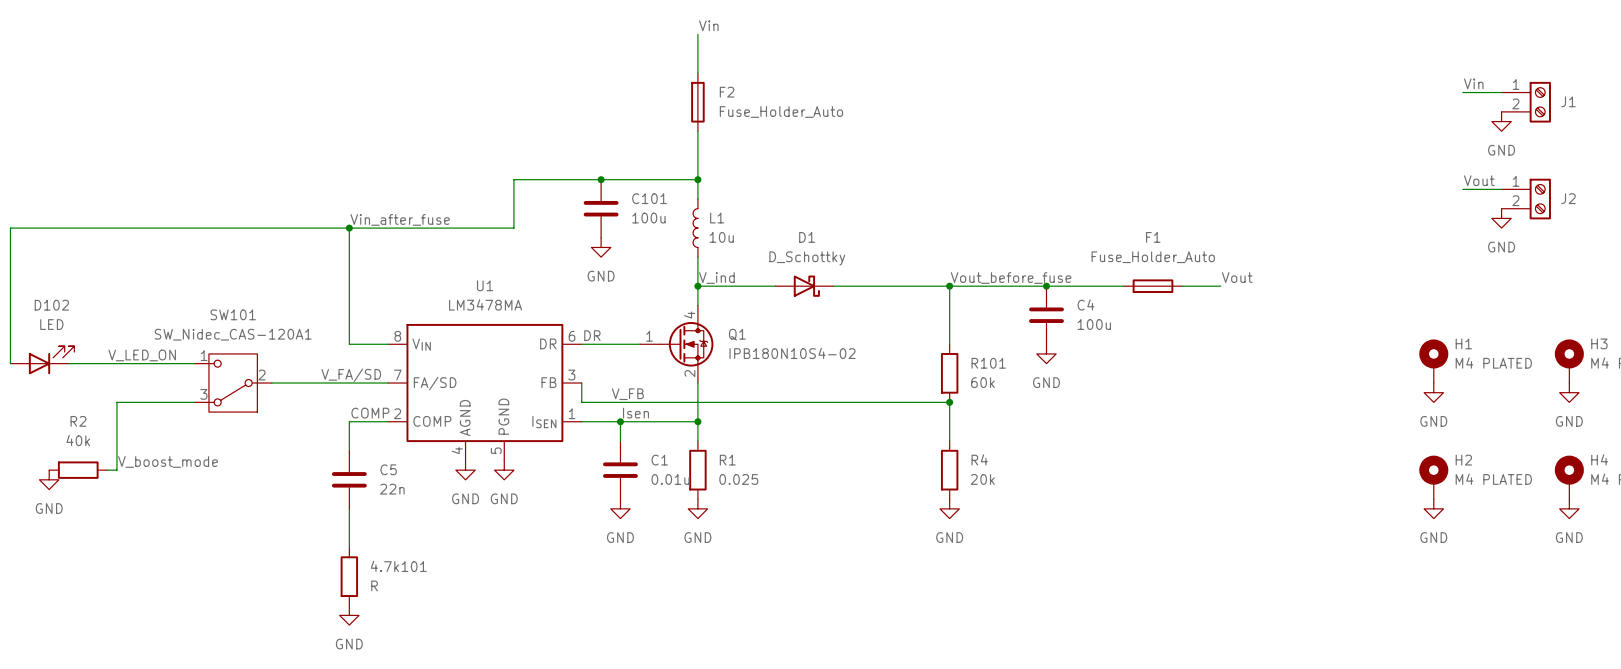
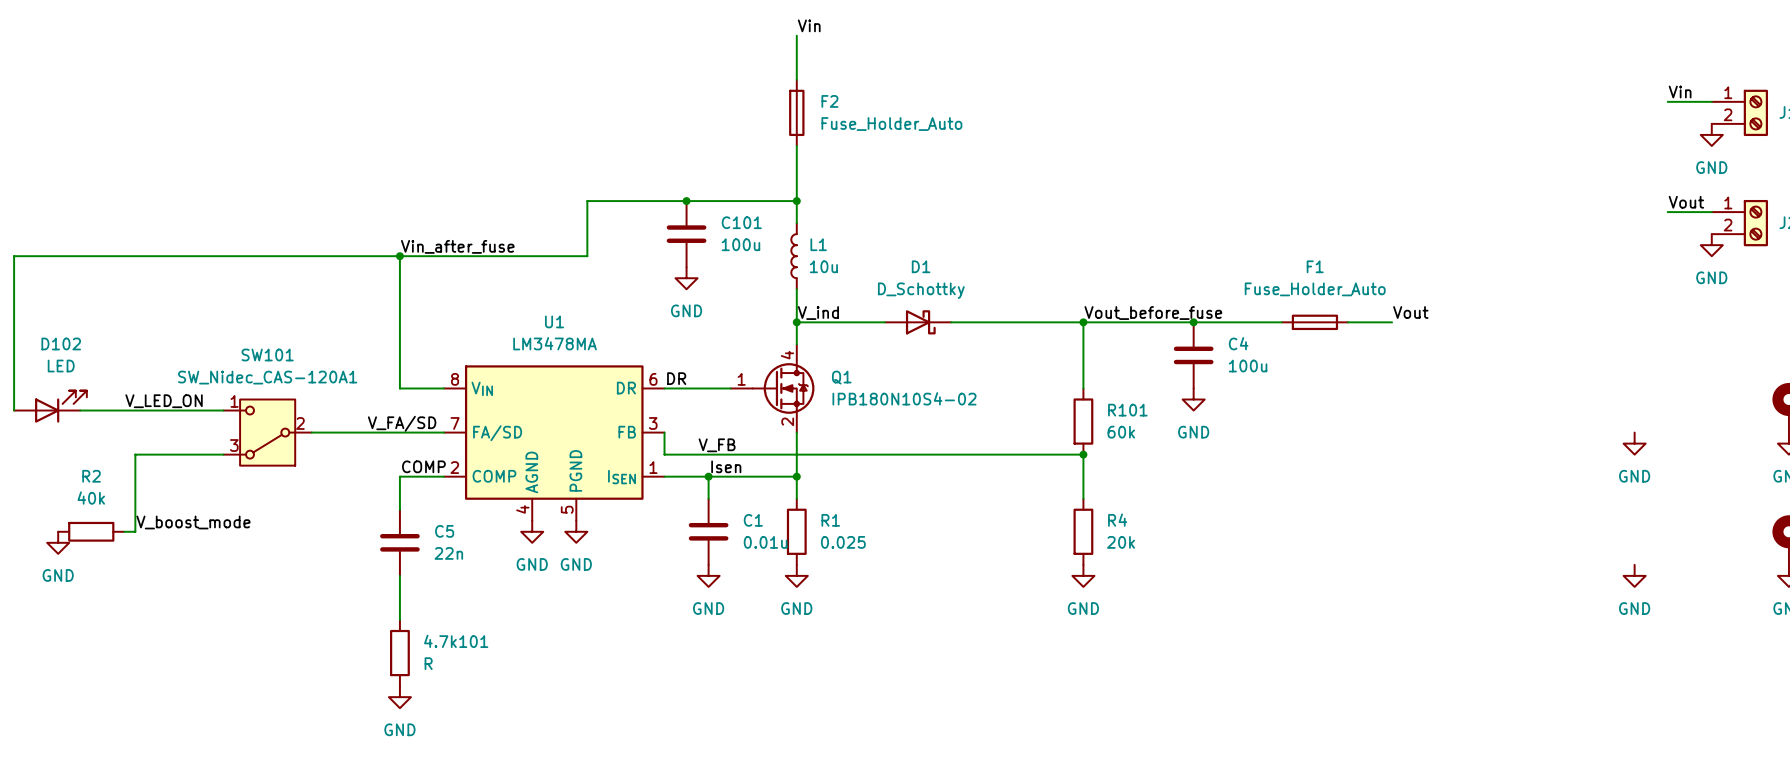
H1: M4 PLATED (1433, 361) -> none
H2: M4 PLATED (1433, 477) -> none

